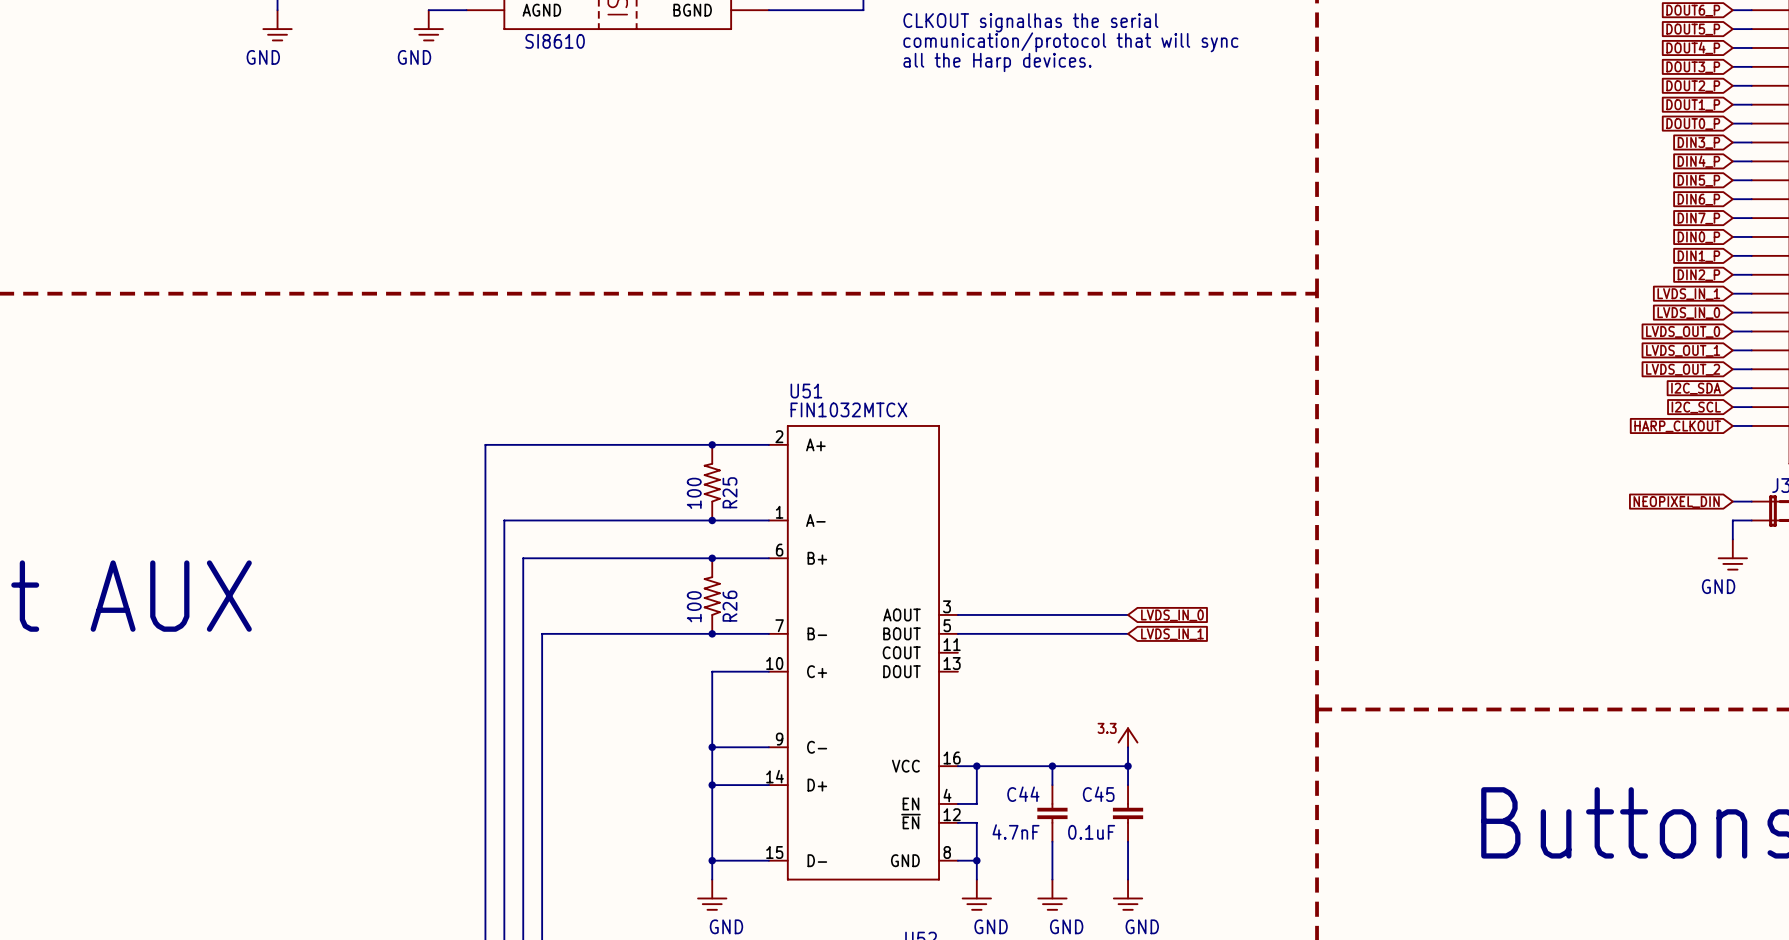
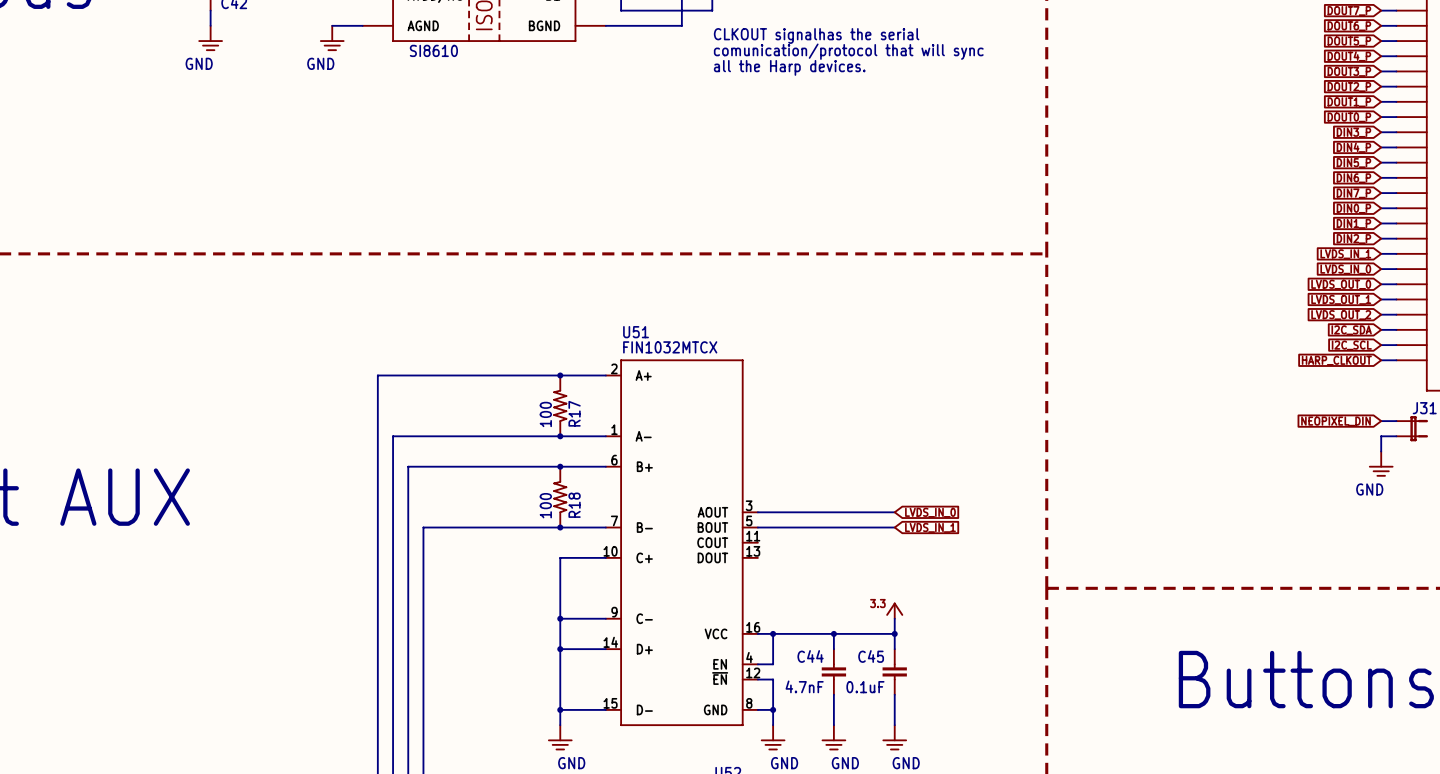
R25 name: R25 (729, 492) -> R17 (574, 413)
R26 name: R26 (729, 606) -> R18 (574, 505)

